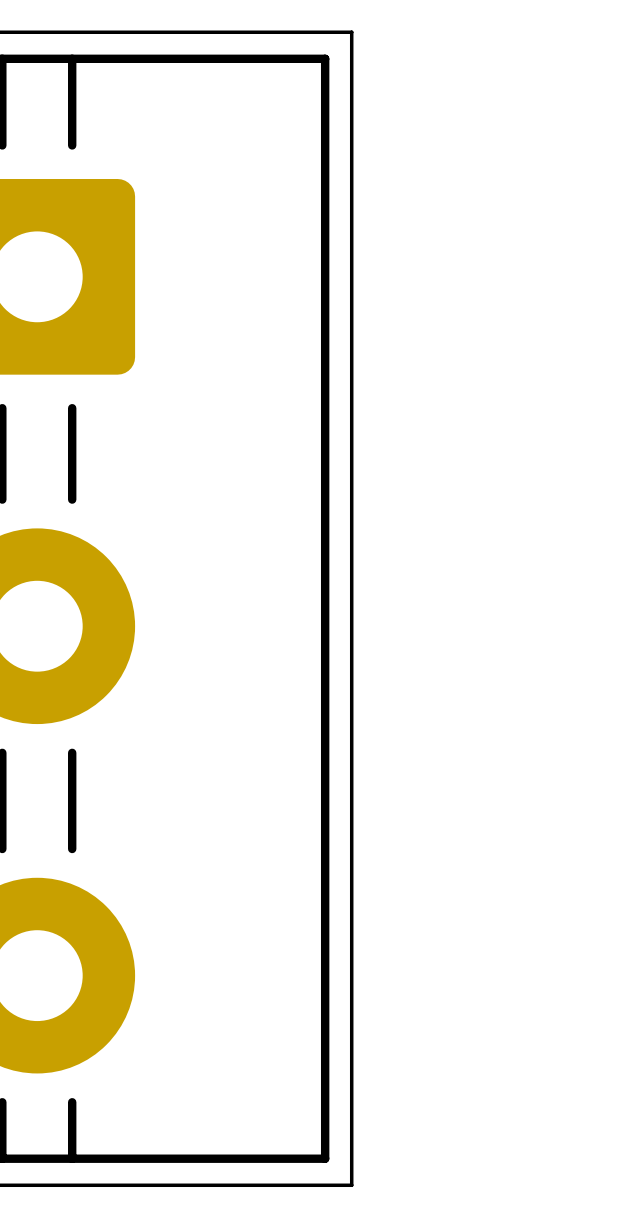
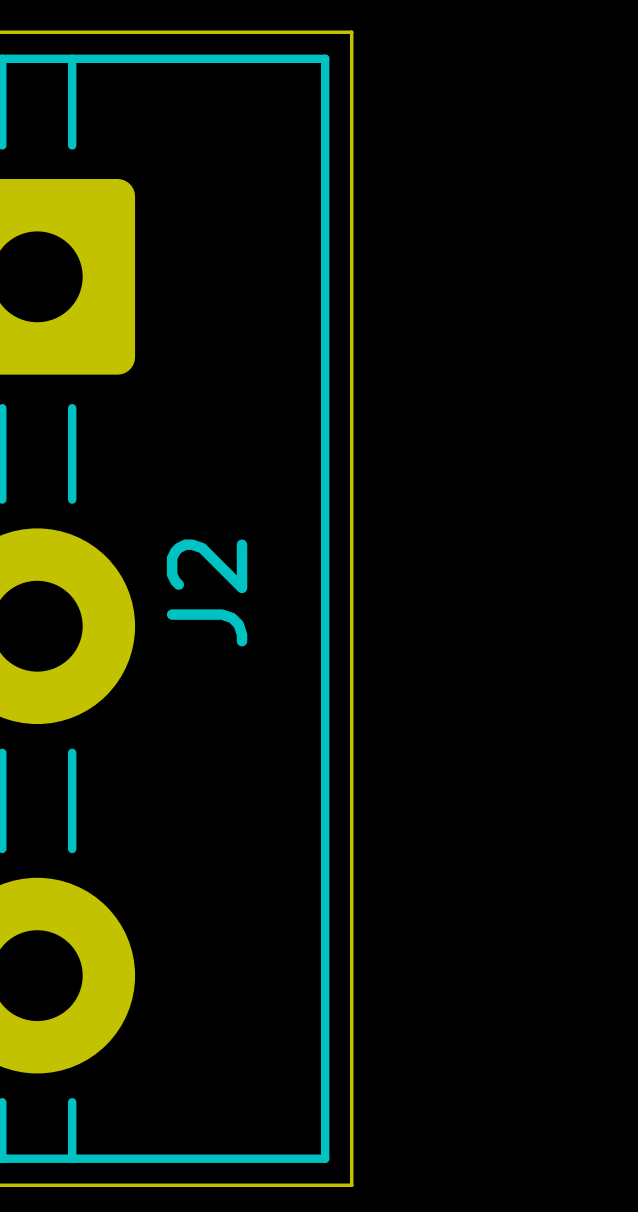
J2 name: none -> J2 (207, 592)

